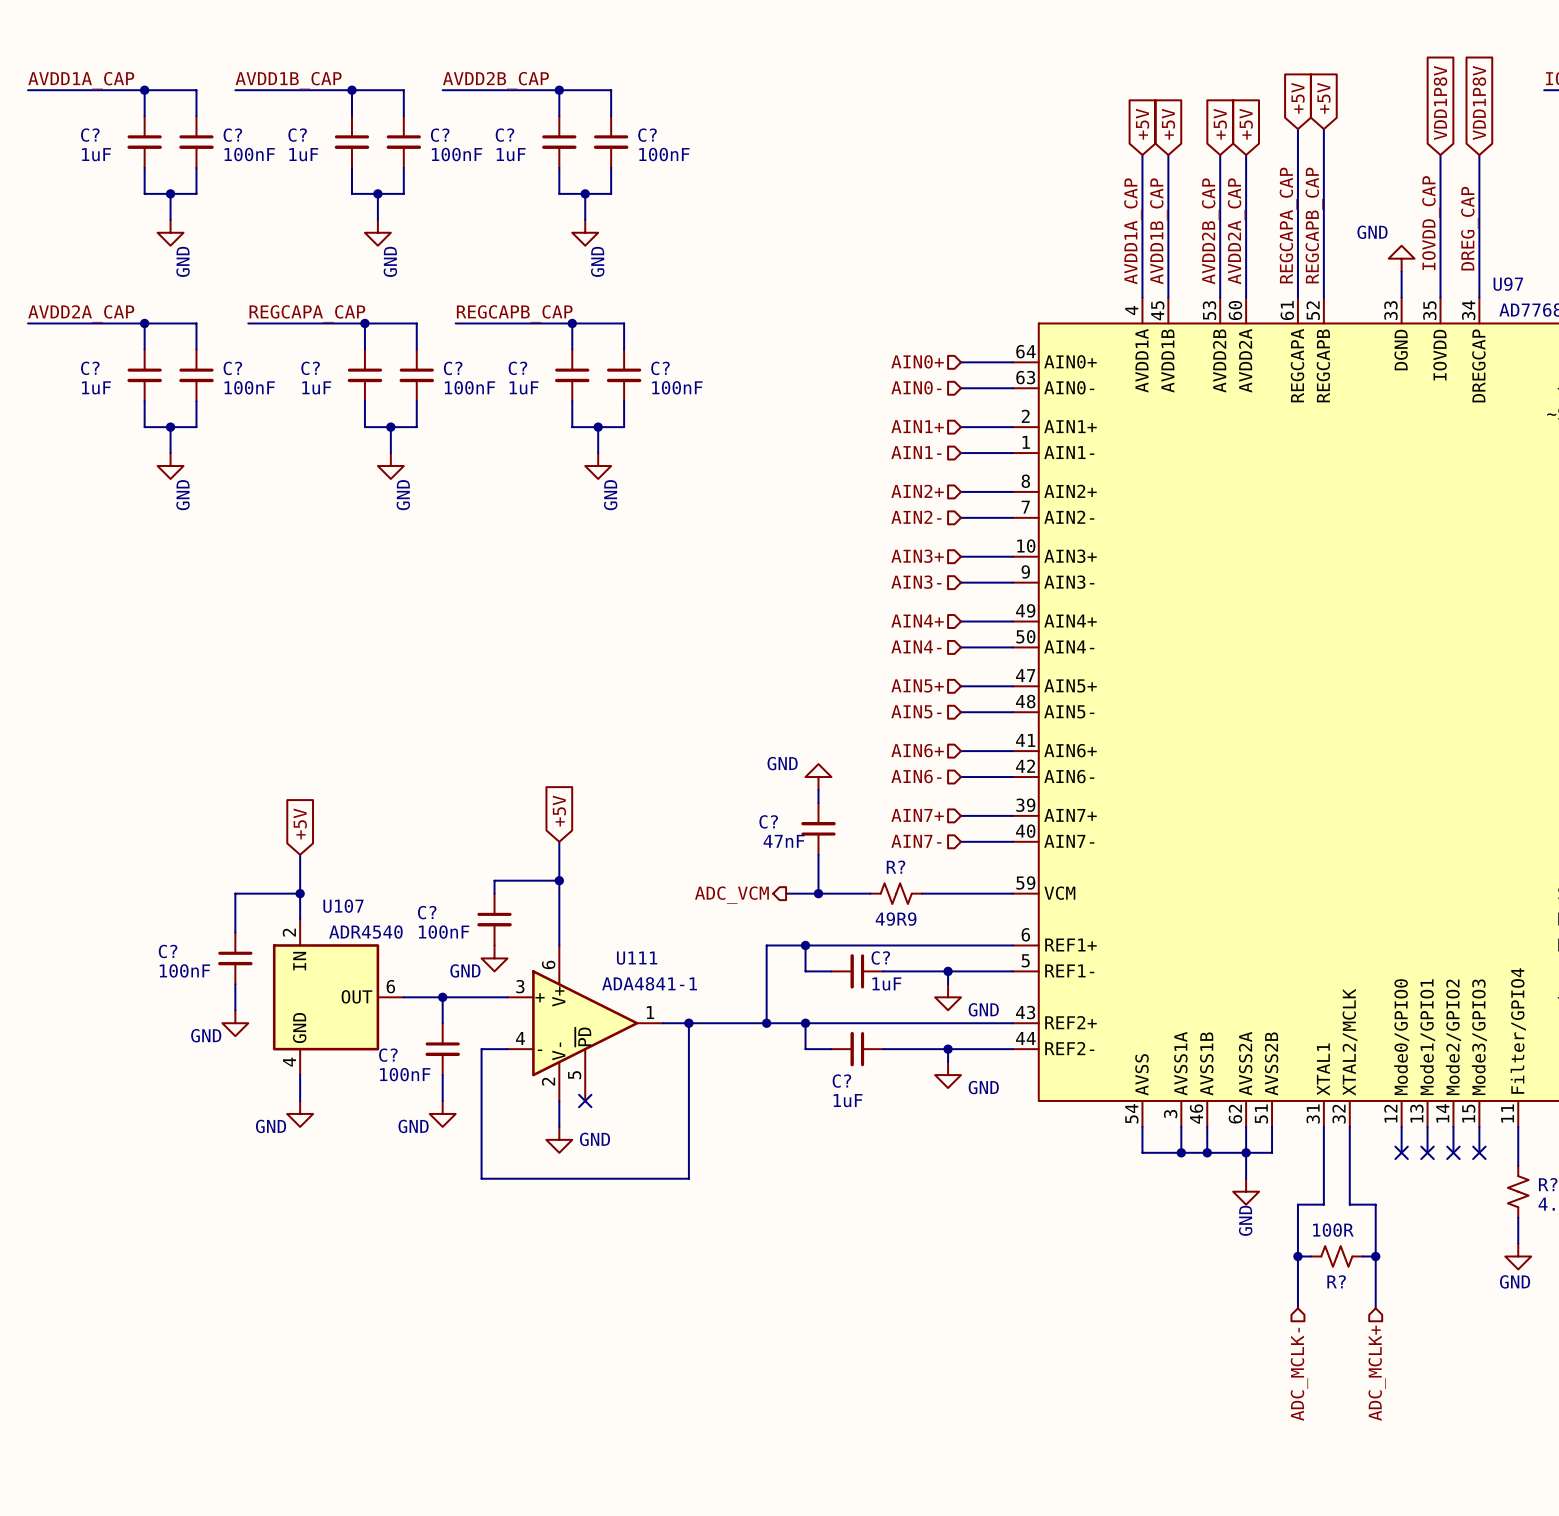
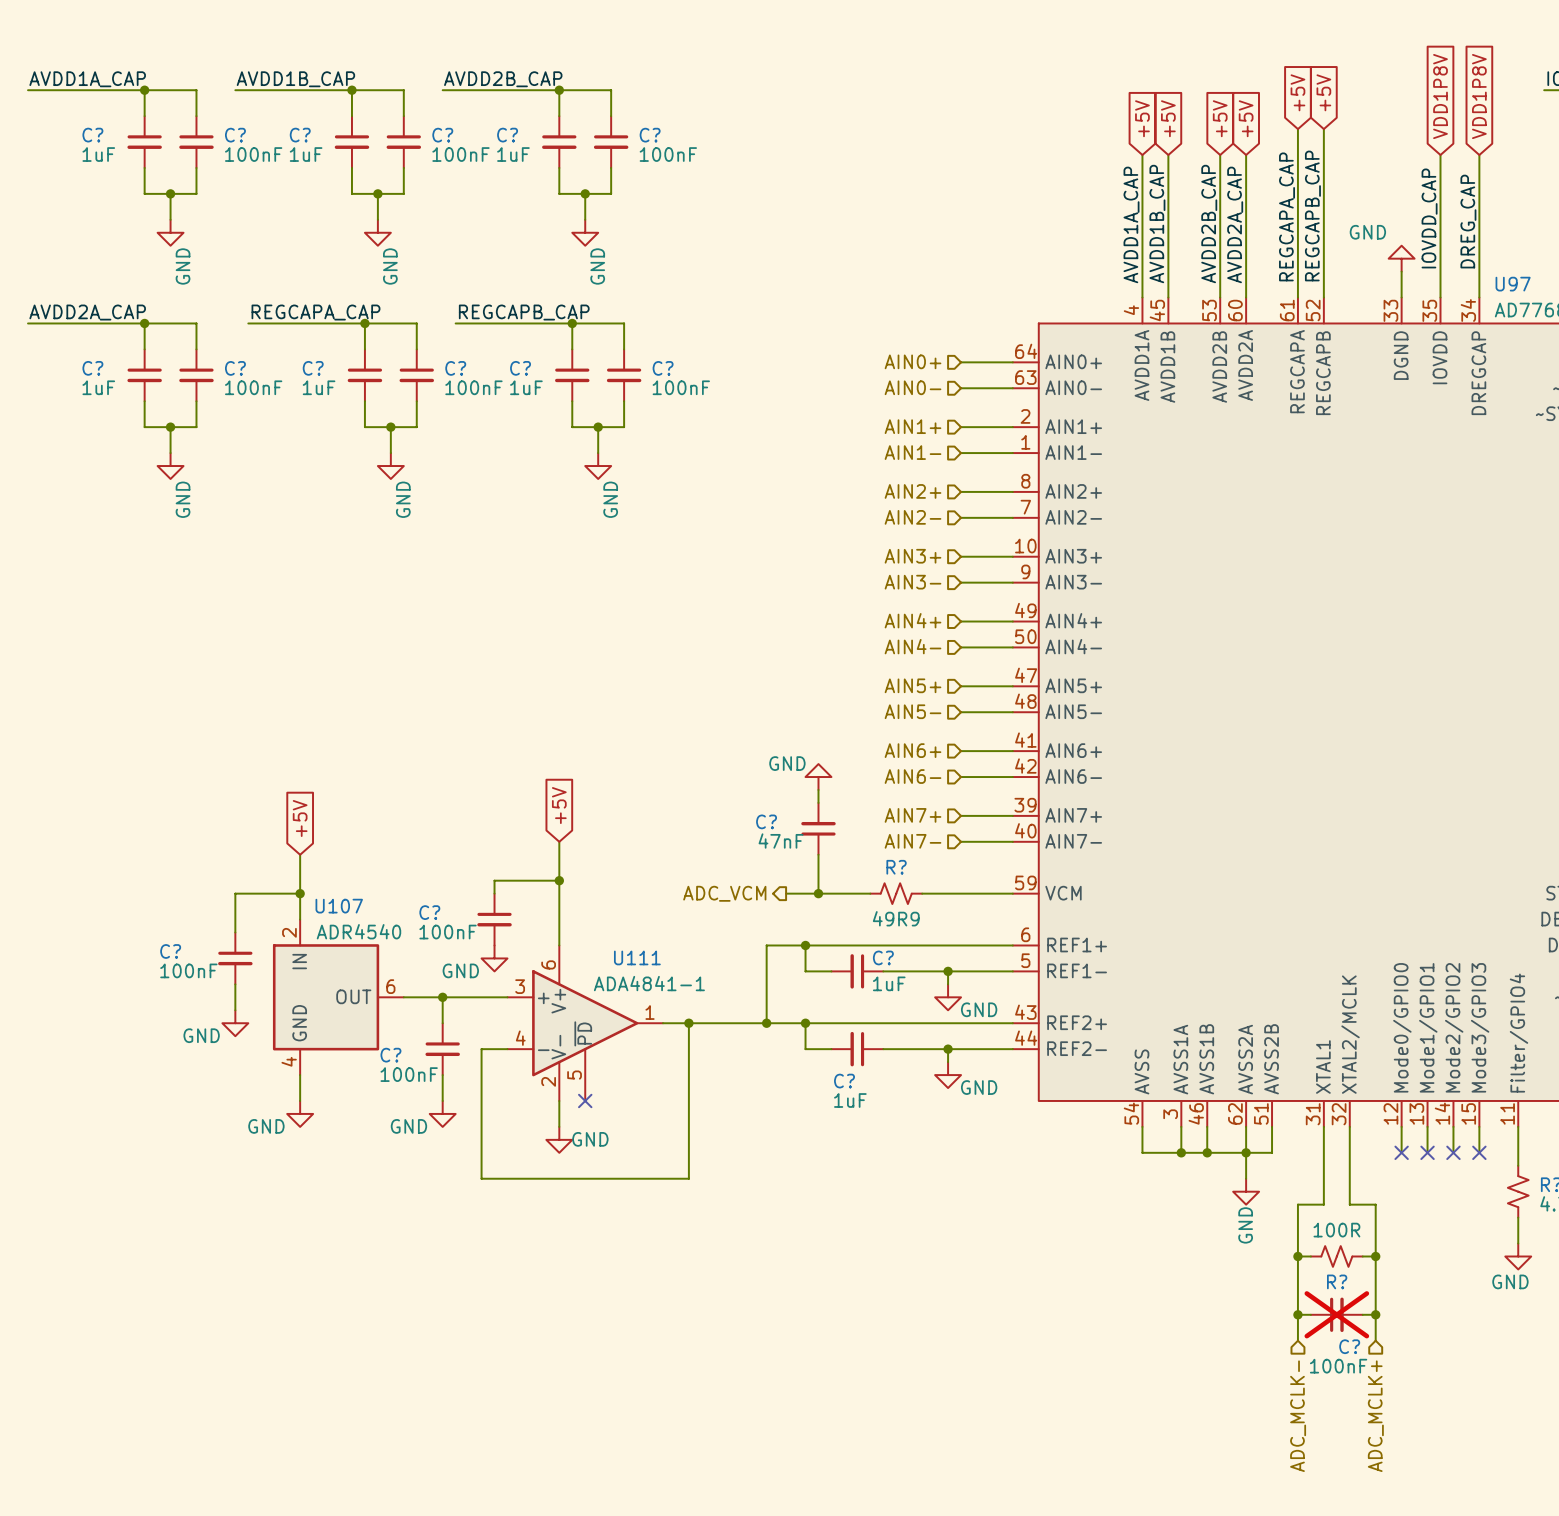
wire: none -> (1297, 1308) (1297, 1340)
wire: none -> (1375, 1308) (1375, 1340)
wire: none -> (1297, 1314) (1310, 1314)
junction: none -> (1297, 1314)
C?: none -> 100nF (1336, 1314)
wire: none -> (1362, 1314) (1375, 1314)
junction: none -> (1375, 1314)
hierarchical label position: ADC_MCLK+ (1377, 1373) -> ADC_MCLK+ (1375, 1416)
hierarchical label position: ADC_MCLK- (1299, 1374) -> ADC_MCLK- (1298, 1416)

